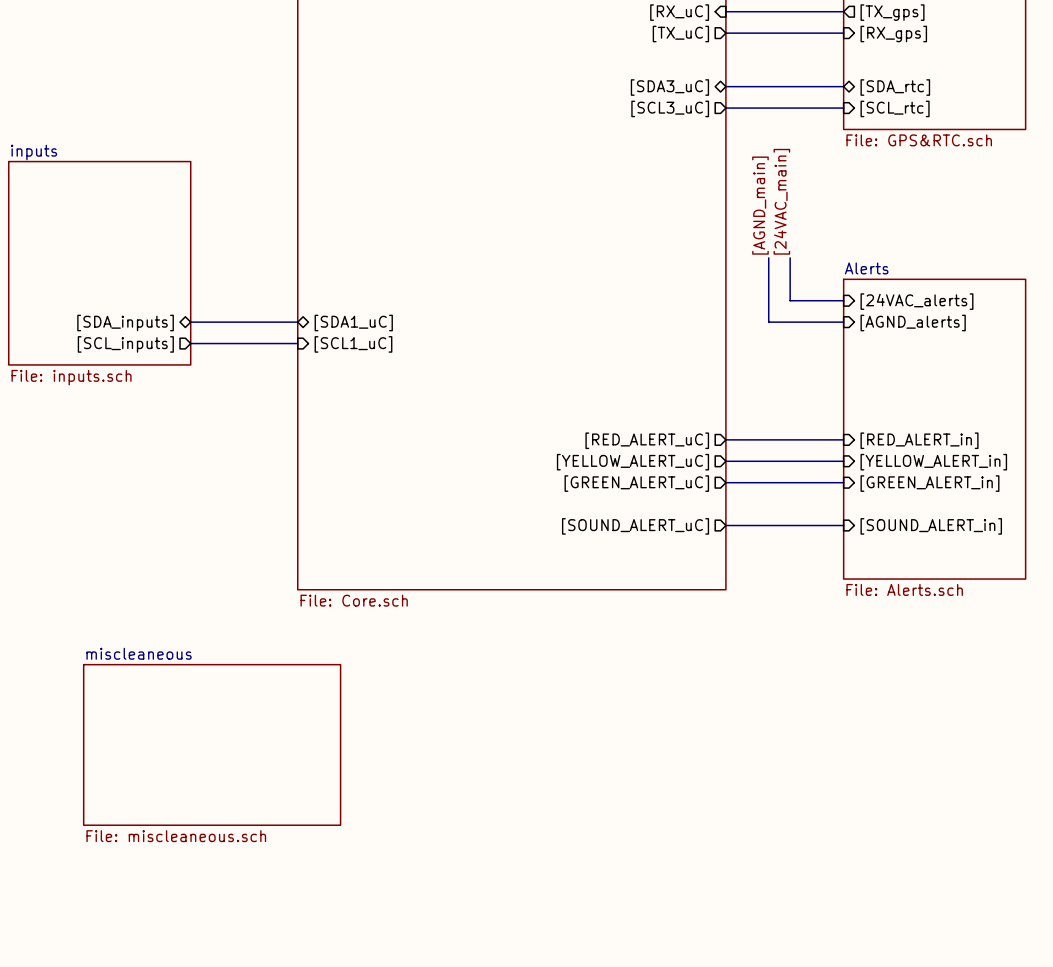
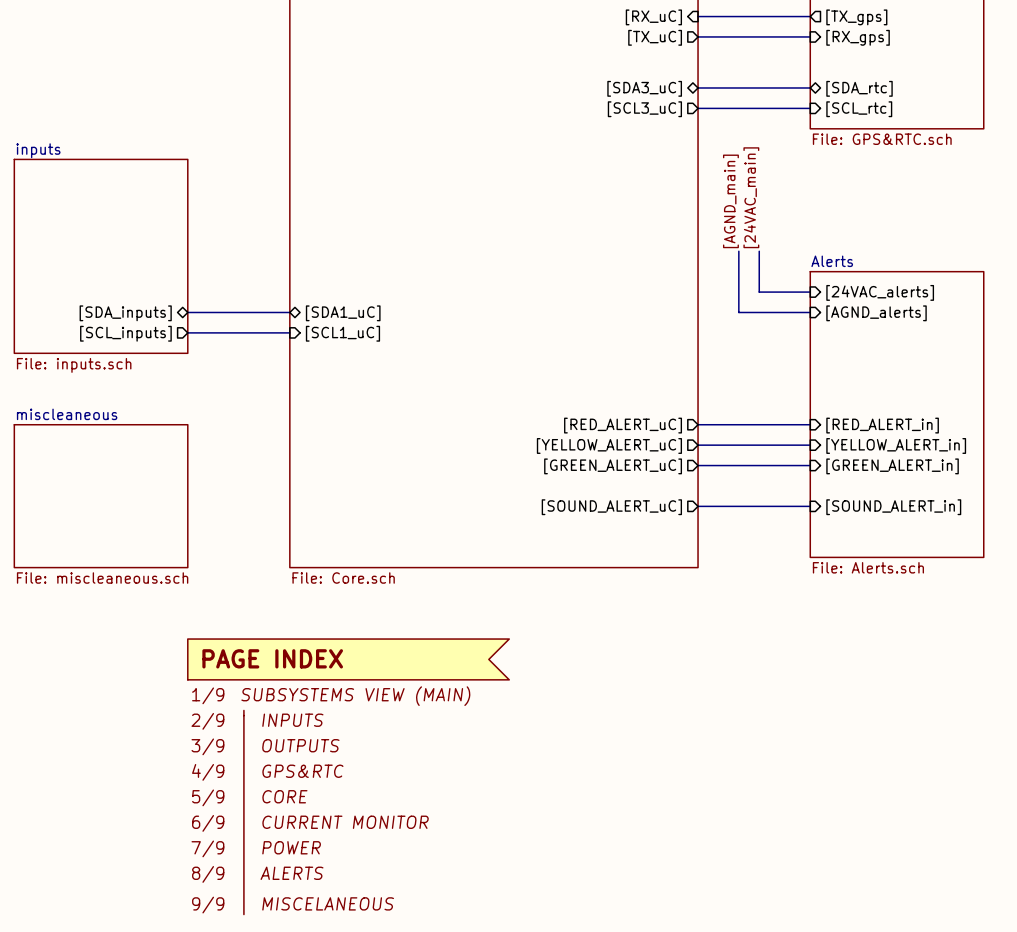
sheet miscleaneous: none -> File: miscleaneous.sch (101, 496)
sheet miscleaneous: File: miscleaneous.sch (212, 744) -> none
power symbol: none -> (348, 776)

